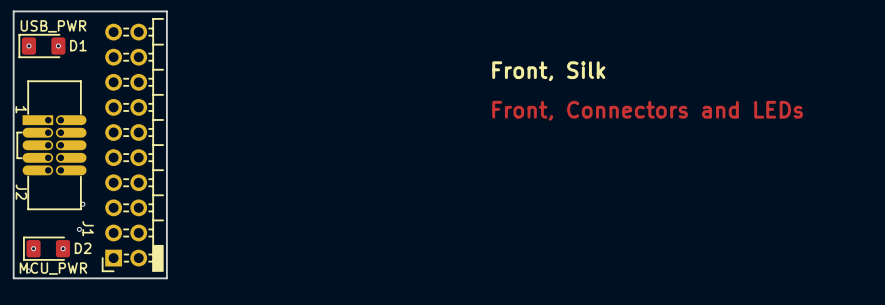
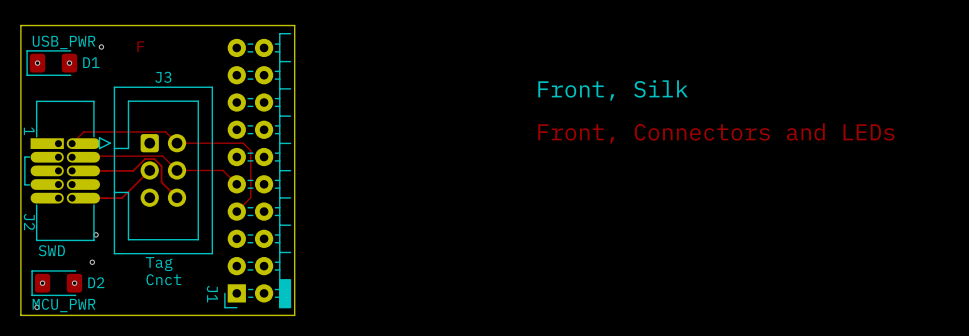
board edge: (166, 11) (166, 278) -> (187, 25) (294, 25) (294, 315) (187, 315)
J1 footprint: [102, 18, 164, 272] -> [224, 33, 292, 309]
drawing: none -> [137, 41, 145, 53]
via: none -> (101, 47)
track: none -> (72, 143) (83, 131) (165, 131) (177, 143) (243, 143) (250, 150) (250, 197) (236, 211)
track: none -> (72, 157) (162, 156) (177, 170) (222, 170) (236, 184)
track: none -> (149, 170) (122, 198) (72, 198)
J3: none -> (155, 170)
track: none -> (72, 170) (133, 170) (145, 159) (154, 159) (161, 166) (161, 182) (177, 197)
text: none -> SWD (51, 250)
J1 name position: J1 (88, 228) -> J1 (212, 294)
text: none -> Tag (159, 264)
text: none -> Cnct (163, 279)

